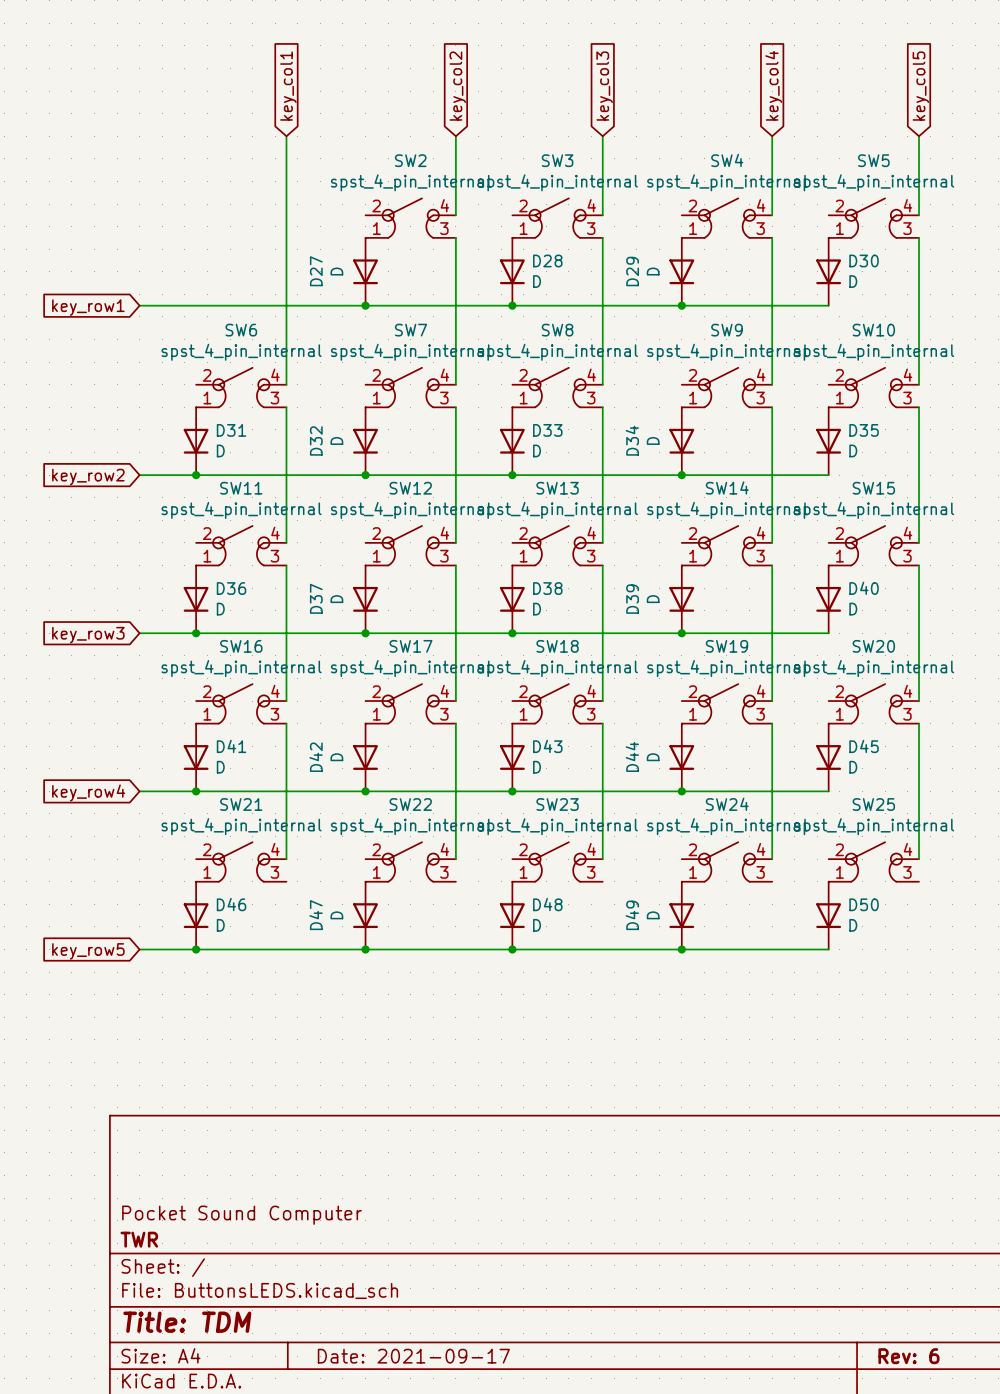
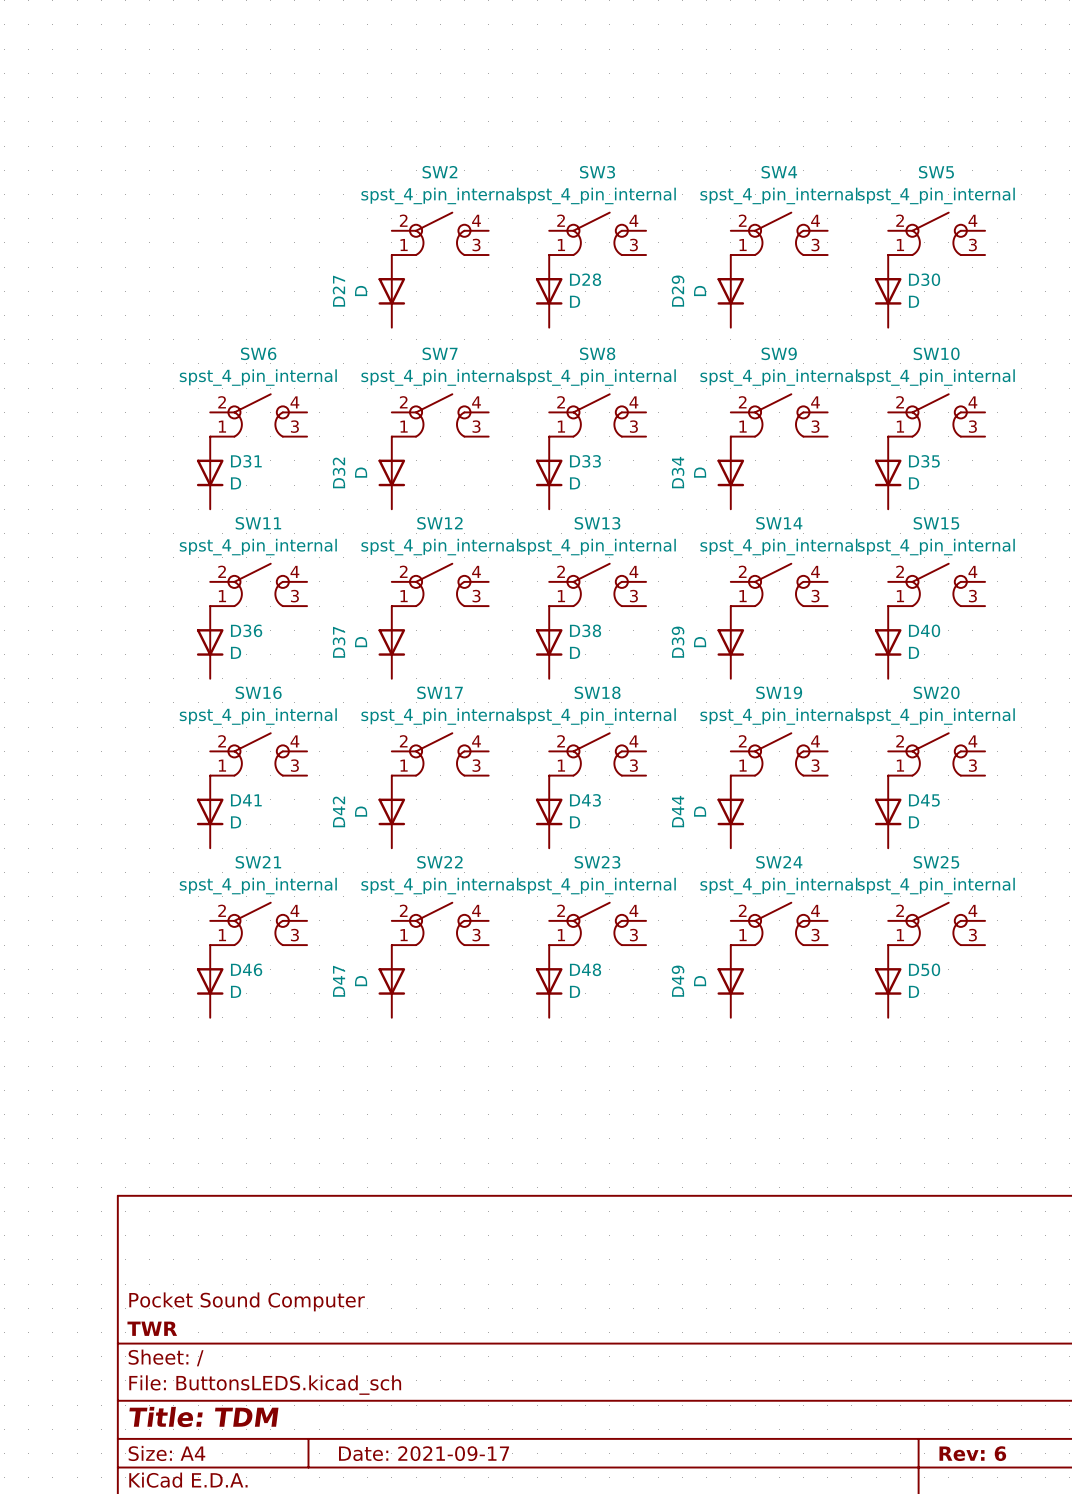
global label: key_col4 (773, 85) -> none
global label: key_col1 (288, 86) -> none
global label: key_col2 (457, 86) -> none
global label: key_col3 (604, 86) -> none
global label: key_col5 (920, 86) -> none
wire: (286, 136) (286, 384) -> none
wire: (455, 136) (455, 215) -> none
wire: (602, 136) (602, 215) -> none
wire: (772, 136) (772, 215) -> none
wire: (919, 136) (919, 215) -> none
wire: (455, 237) (455, 384) -> none
wire: (602, 237) (602, 384) -> none
wire: (772, 237) (772, 384) -> none
wire: (919, 237) (919, 384) -> none
wire: (139, 305) (828, 305) -> none
junction: (365, 305) -> none
junction: (512, 305) -> none
junction: (681, 305) -> none
global label: key_row1 (88, 307) -> none
wire: (286, 407) (286, 542) -> none
wire: (455, 407) (455, 542) -> none
wire: (602, 407) (602, 542) -> none
wire: (772, 407) (772, 542) -> none
wire: (919, 407) (919, 542) -> none
wire: (139, 475) (828, 475) -> none
junction: (196, 475) -> none
junction: (365, 475) -> none
junction: (512, 475) -> none
junction: (681, 475) -> none
global label: key_row2 (88, 476) -> none
wire: (286, 565) (286, 701) -> none
wire: (455, 565) (455, 701) -> none
wire: (602, 565) (602, 701) -> none
wire: (772, 565) (772, 701) -> none
wire: (919, 565) (919, 701) -> none
wire: (139, 633) (828, 633) -> none
junction: (196, 633) -> none
junction: (365, 633) -> none
junction: (512, 633) -> none
junction: (681, 633) -> none
global label: key_row3 (88, 635) -> none
wire: (286, 723) (286, 859) -> none
wire: (455, 723) (455, 859) -> none
wire: (602, 723) (602, 859) -> none
wire: (772, 723) (772, 859) -> none
wire: (919, 723) (919, 859) -> none
wire: (139, 791) (828, 791) -> none
junction: (196, 791) -> none
junction: (365, 791) -> none
junction: (512, 791) -> none
junction: (681, 791) -> none
global label: key_row4 (88, 792) -> none
wire: (139, 949) (828, 949) -> none
junction: (196, 949) -> none
junction: (365, 949) -> none
junction: (512, 949) -> none
junction: (681, 949) -> none
global label: key_row5 (88, 951) -> none

